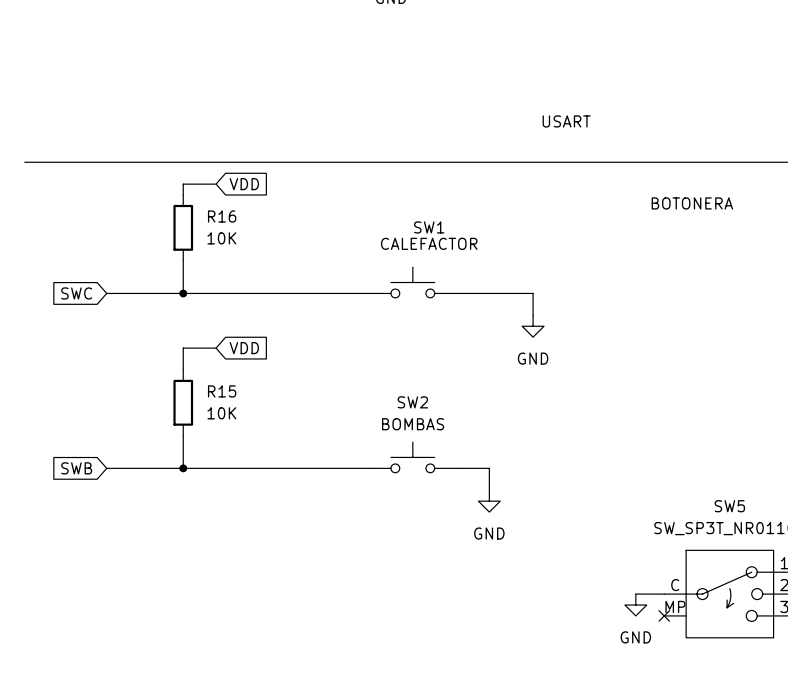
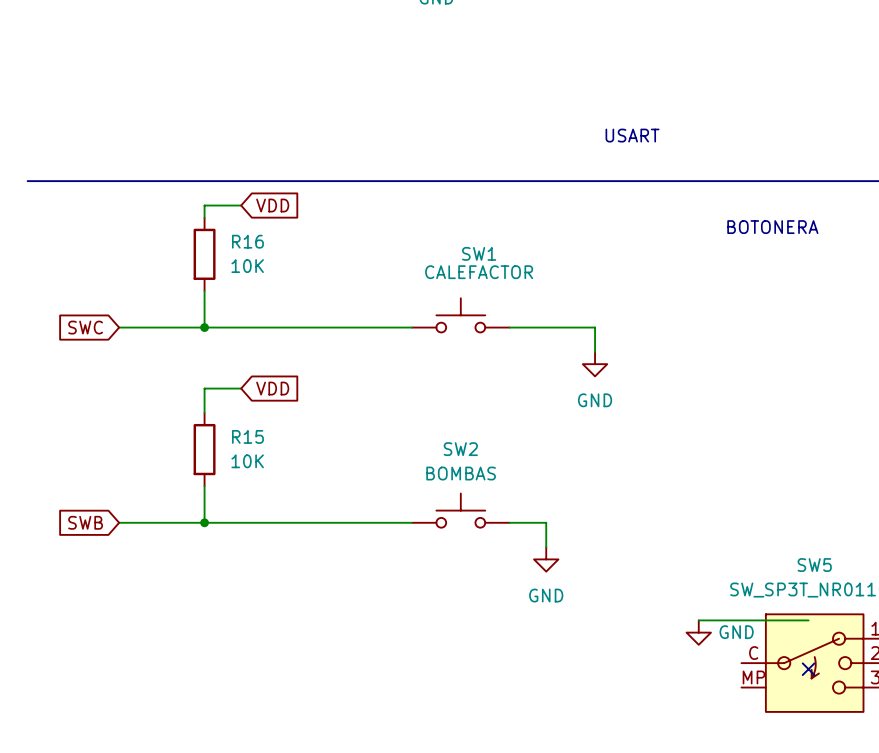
wire: none -> (698, 620) (808, 620)
wire: (635, 594) (664, 594) -> none
no-connect mark: none -> (808, 669)
power symbol position: GND (635, 605) -> GND (698, 632)
no-connect mark: (664, 615) -> none
power symbol text position: GND (635, 637) -> GND (736, 632)

